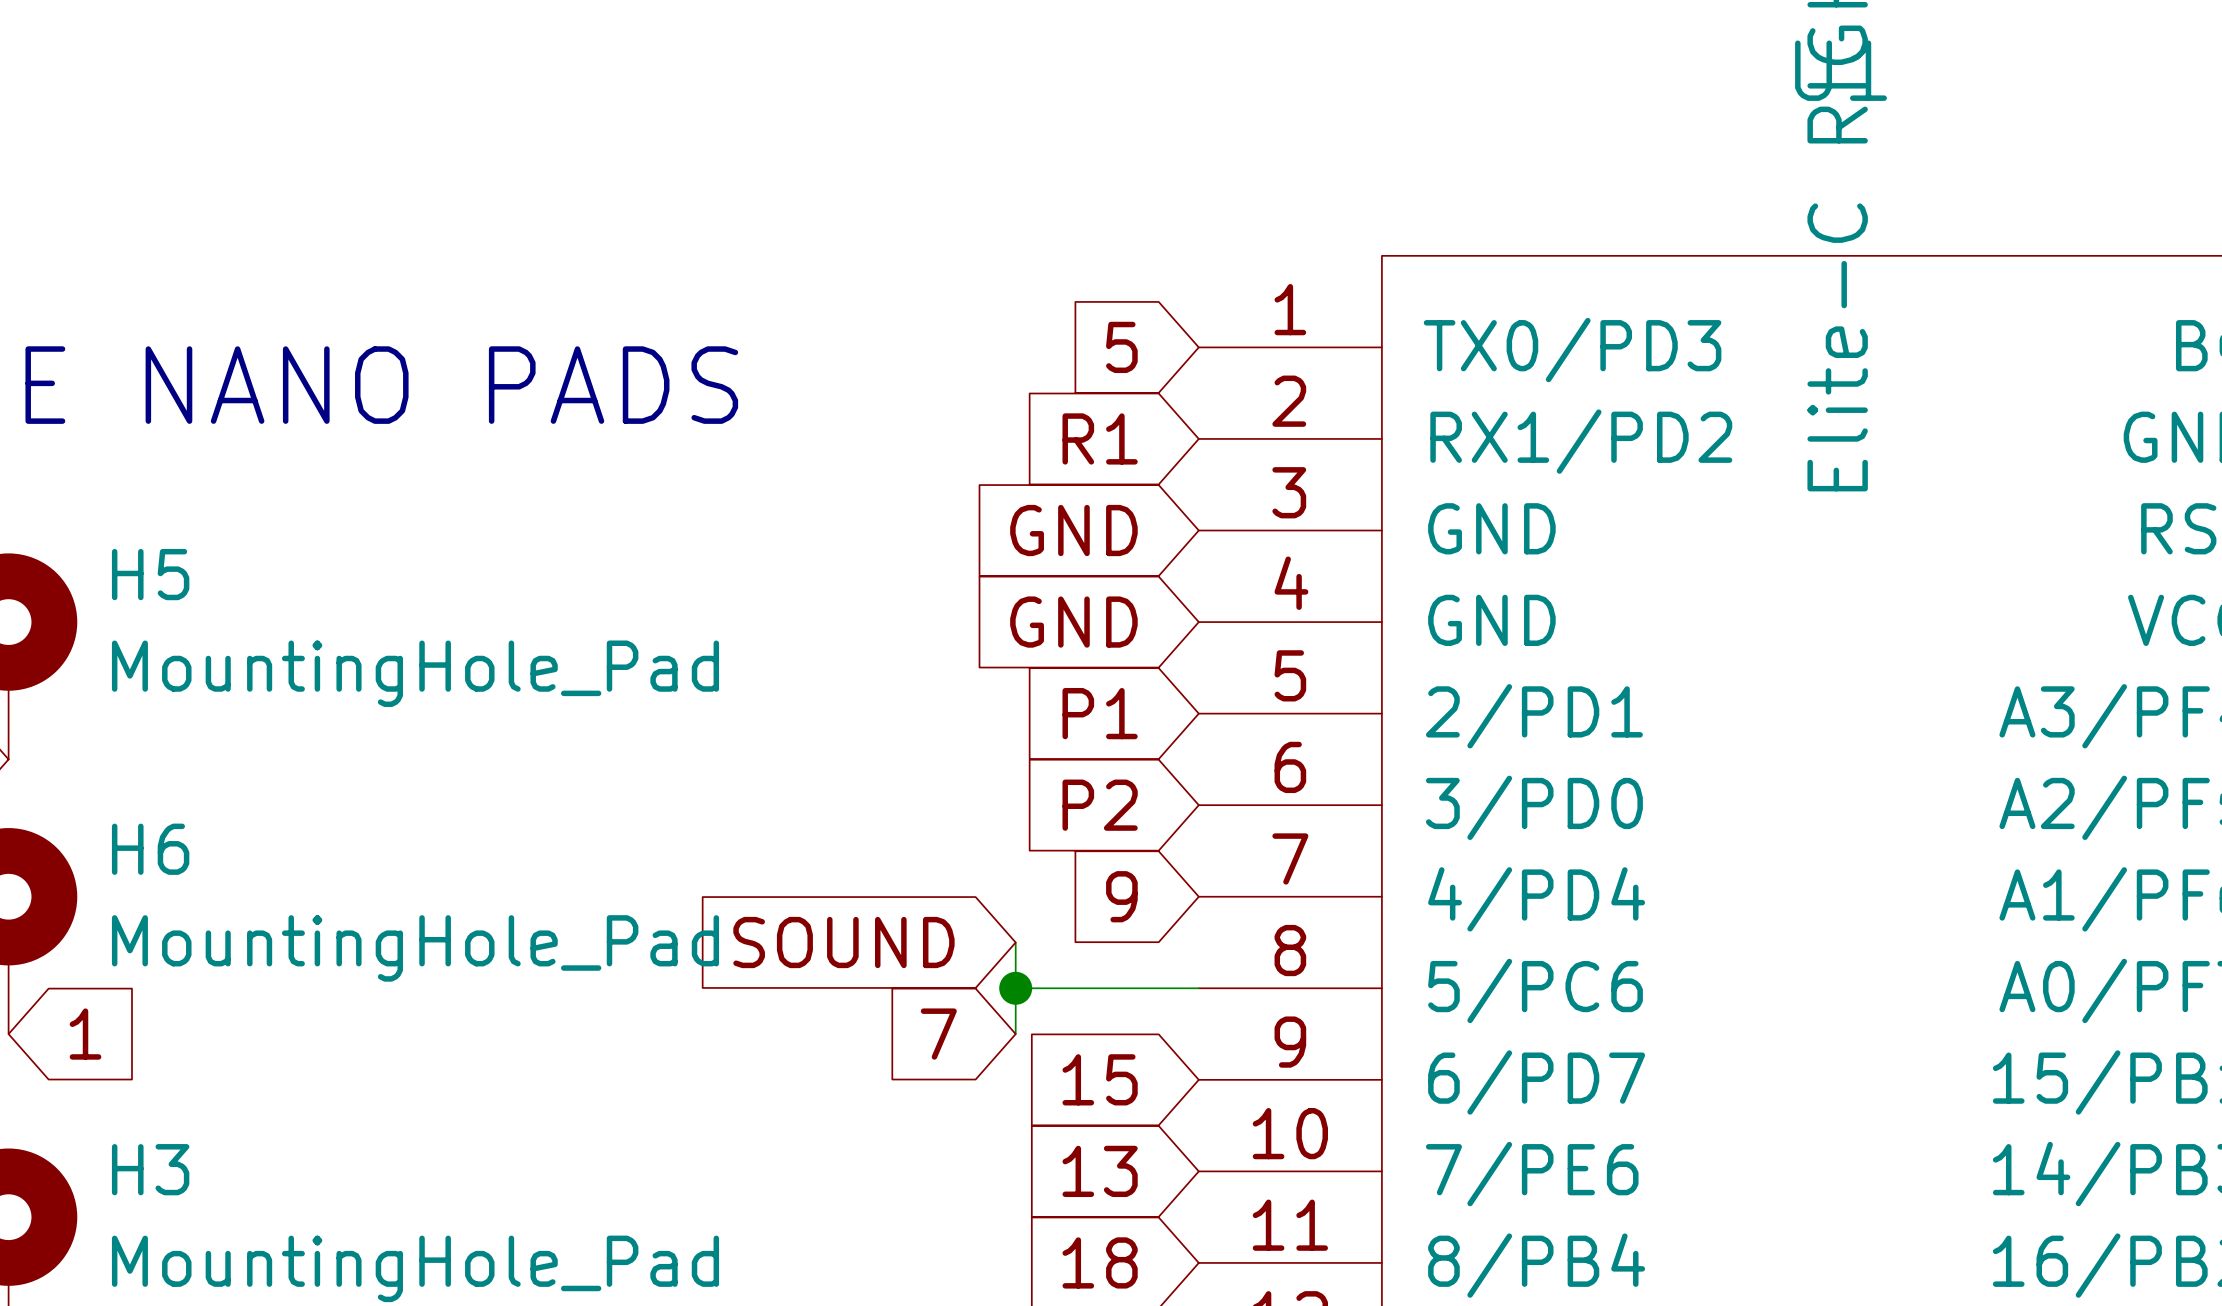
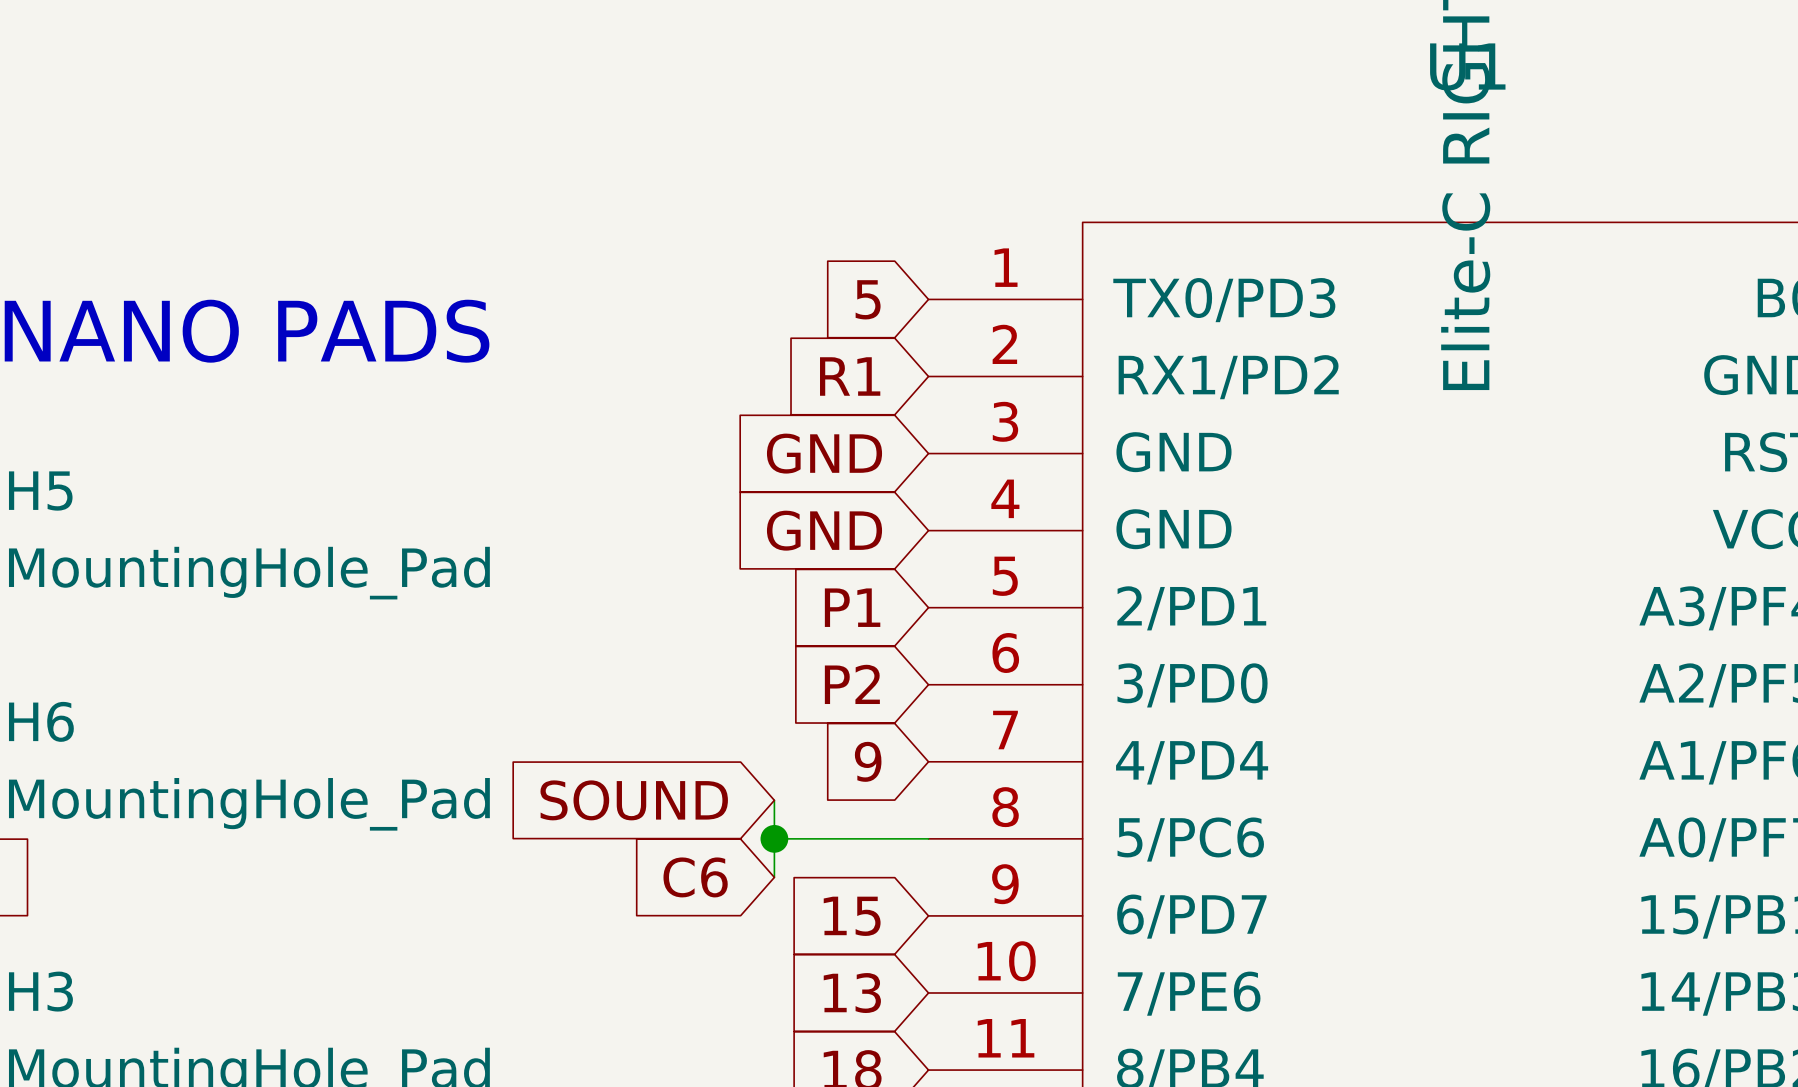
global label: 7 (938, 1034) -> C6 (695, 877)

